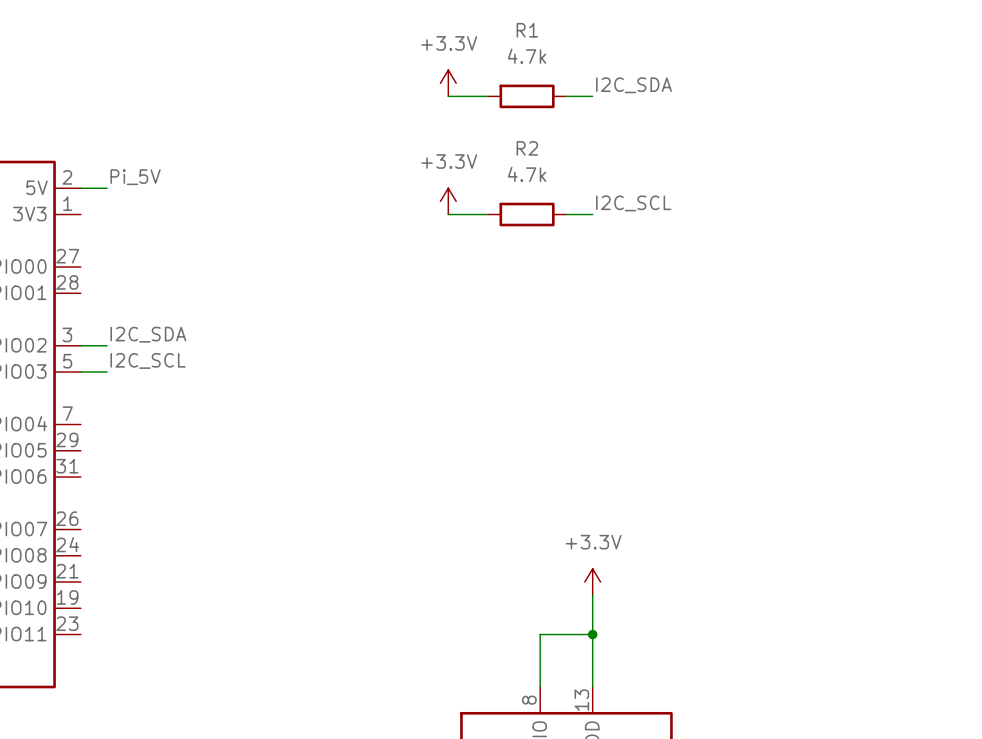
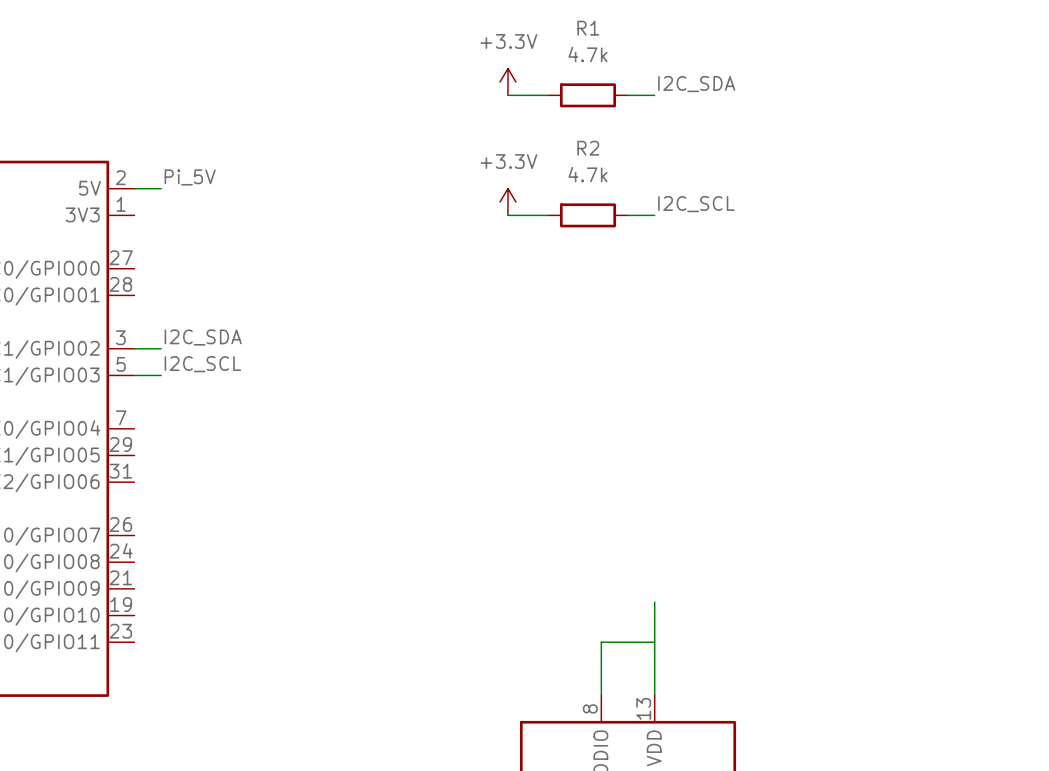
power symbol: +3.3V (592, 582) -> none
junction: (592, 634) -> none

